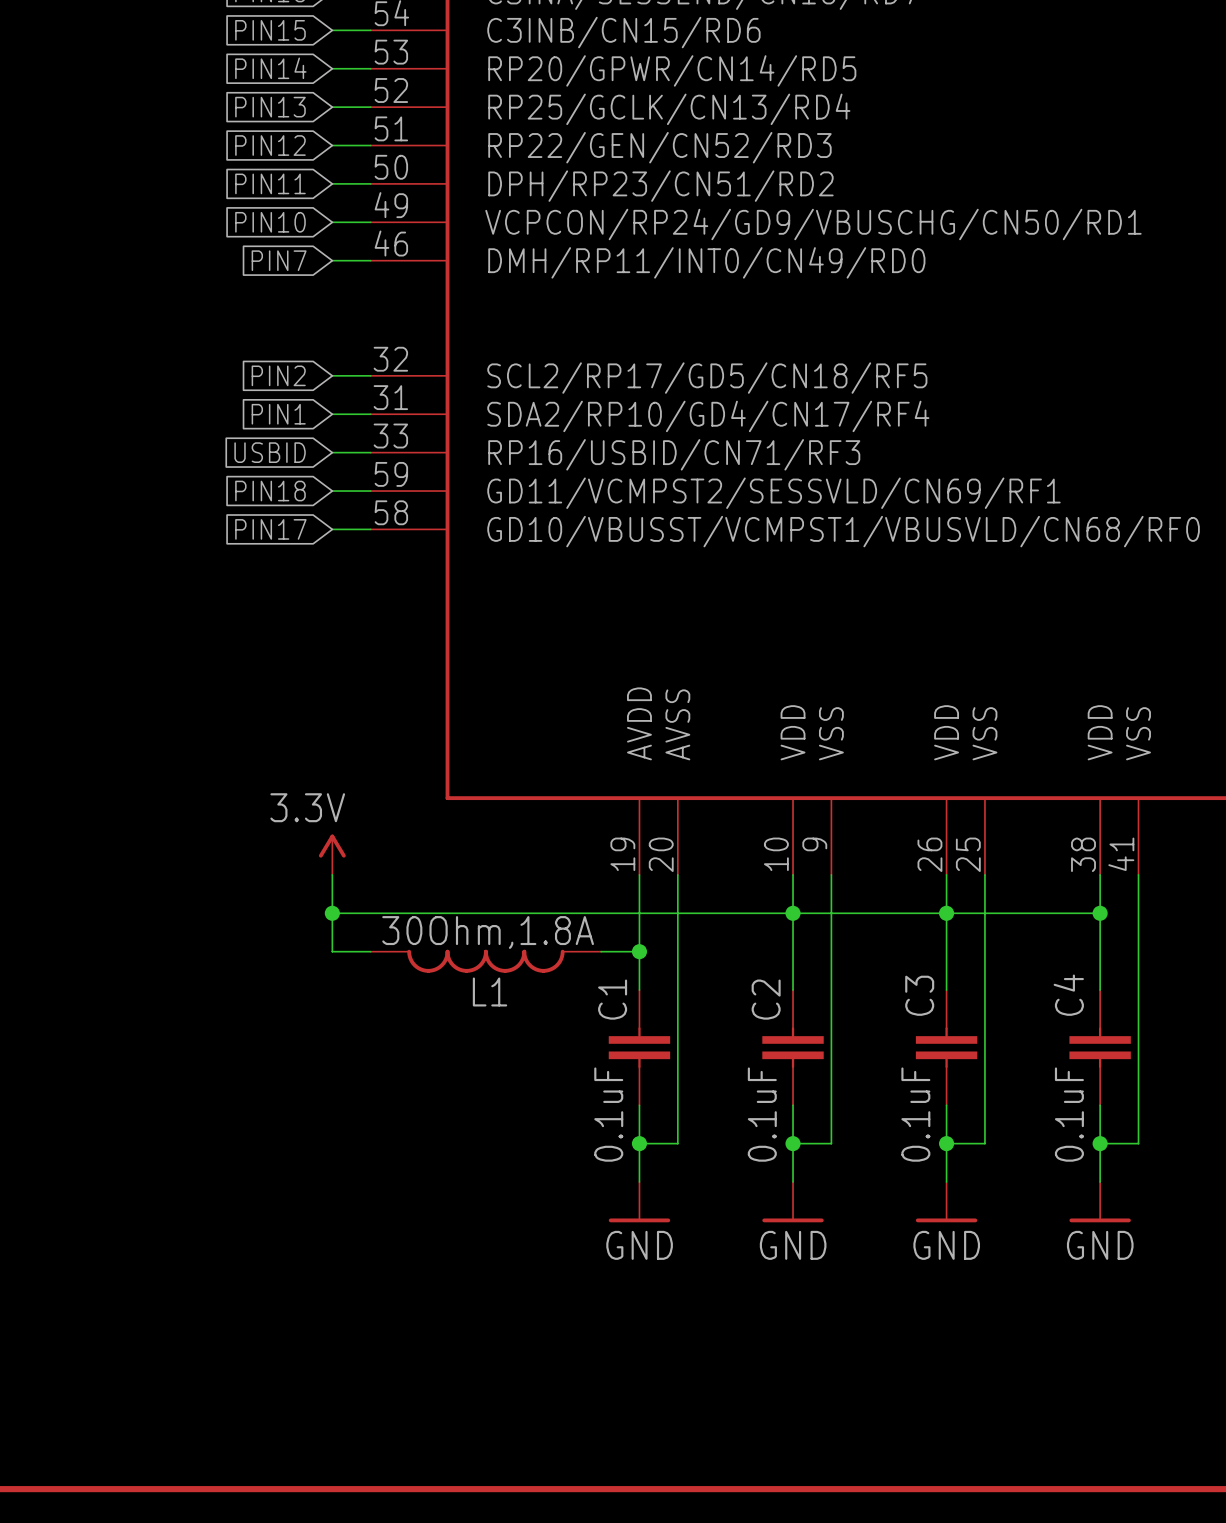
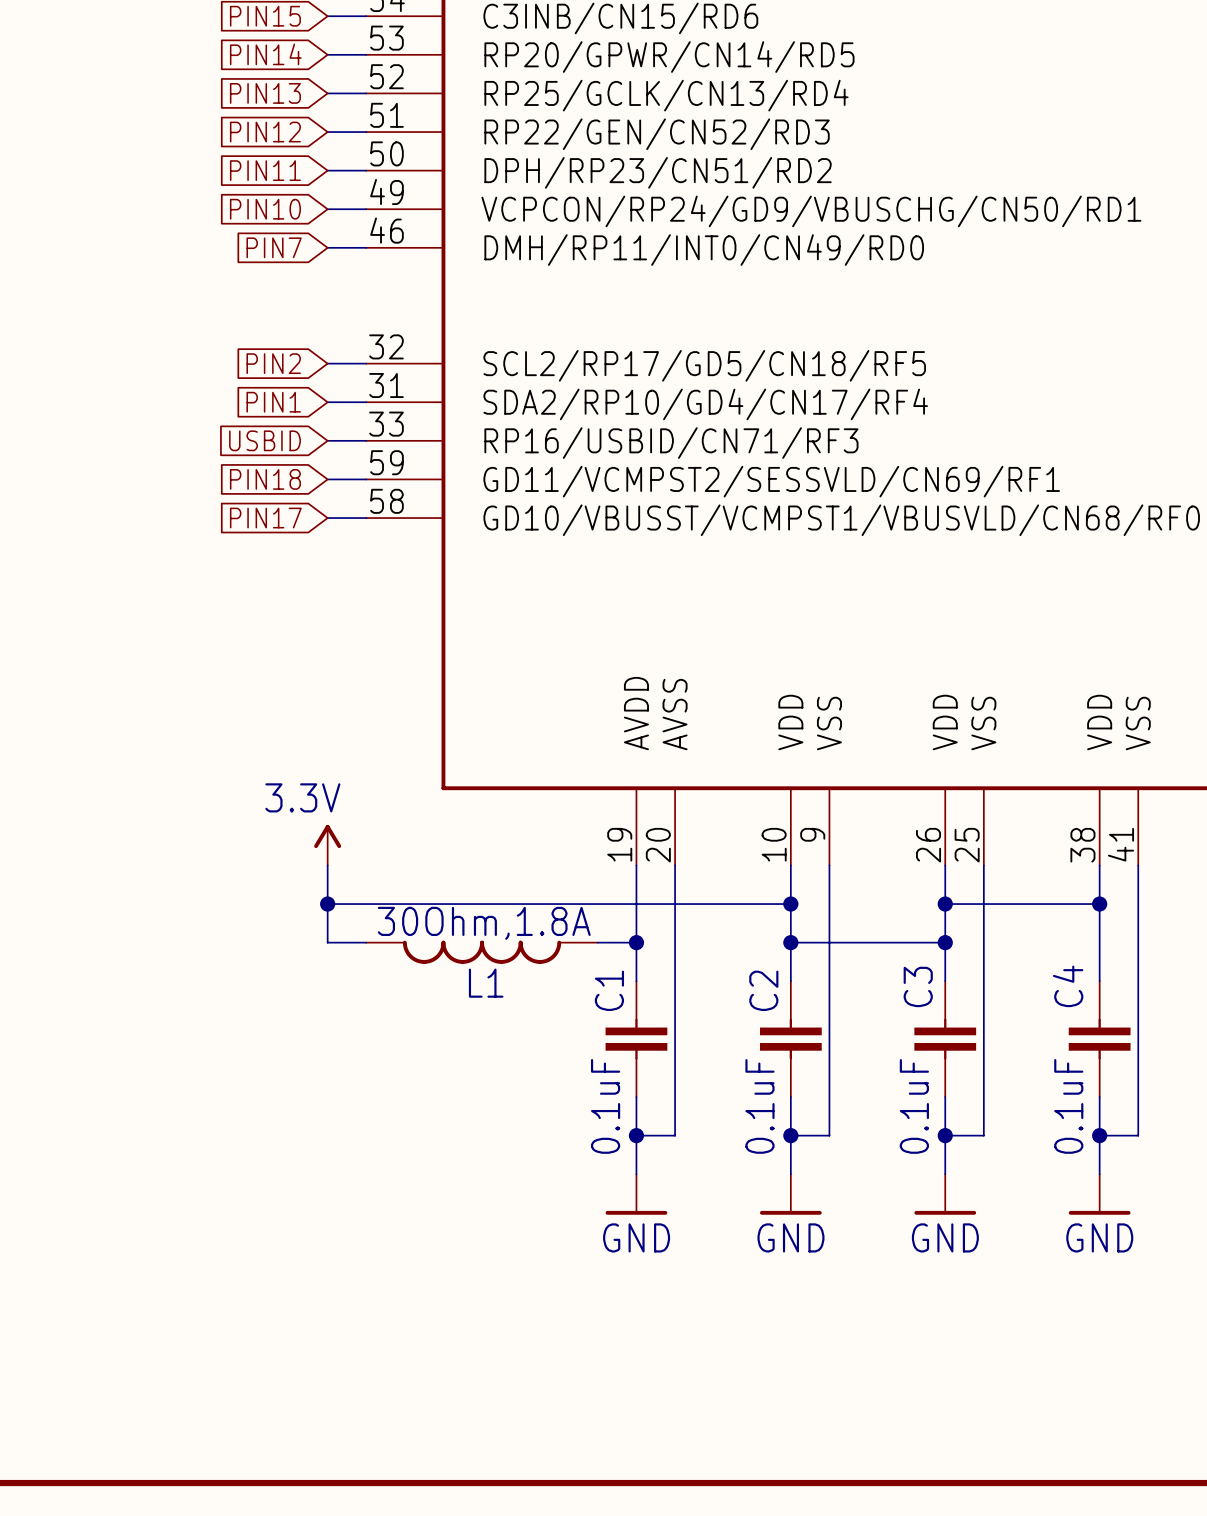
wire: (793, 913) (946, 913) -> (790, 942) (945, 942)
junction: none -> (790, 942)
junction: none -> (945, 942)

